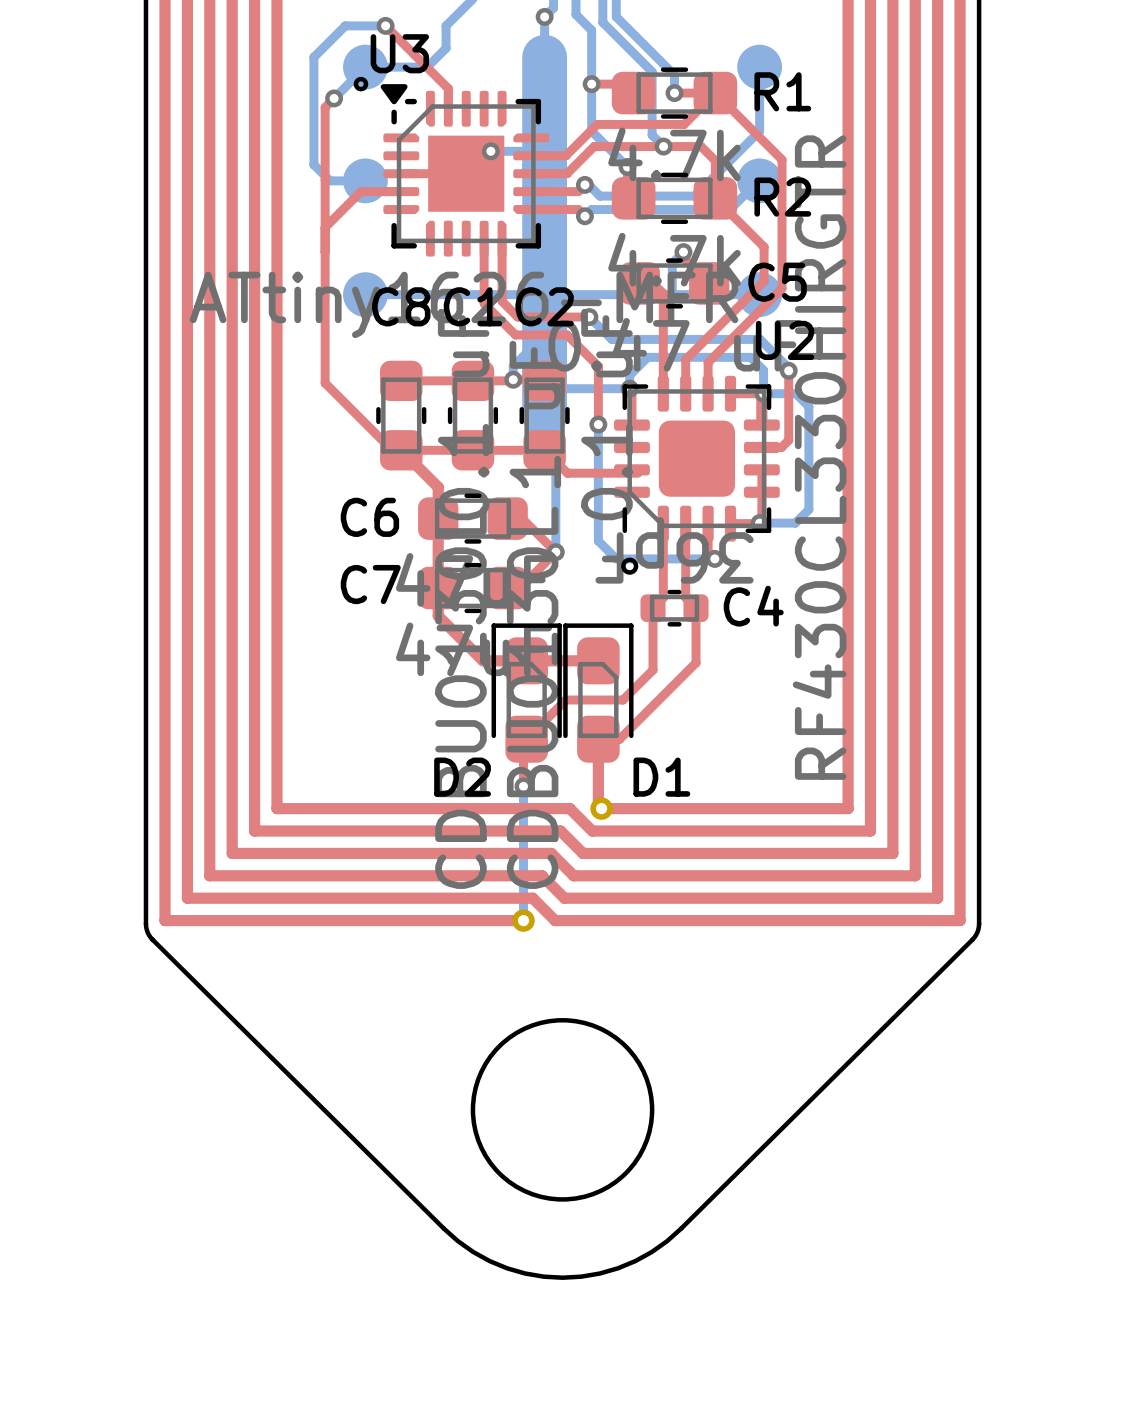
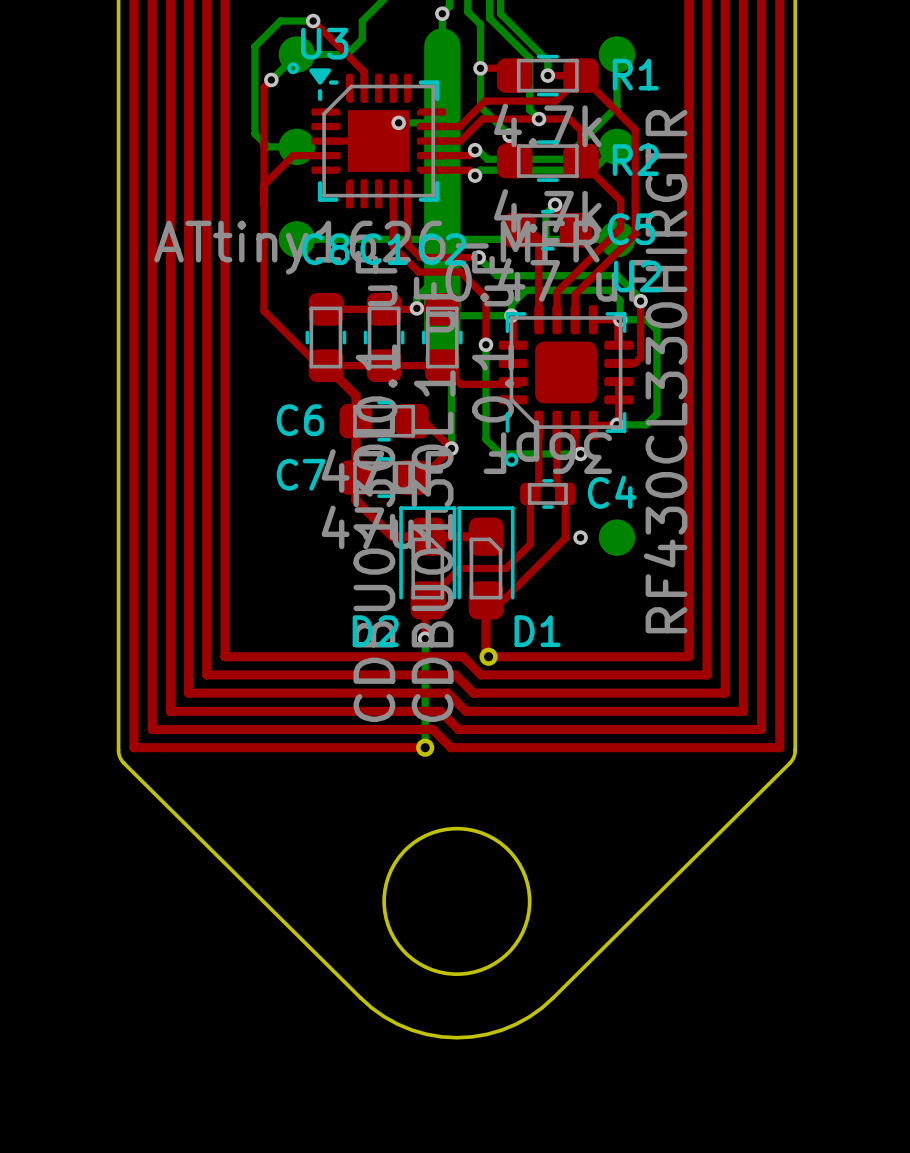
via: none -> (580, 537)
part: none -> (616, 537)

